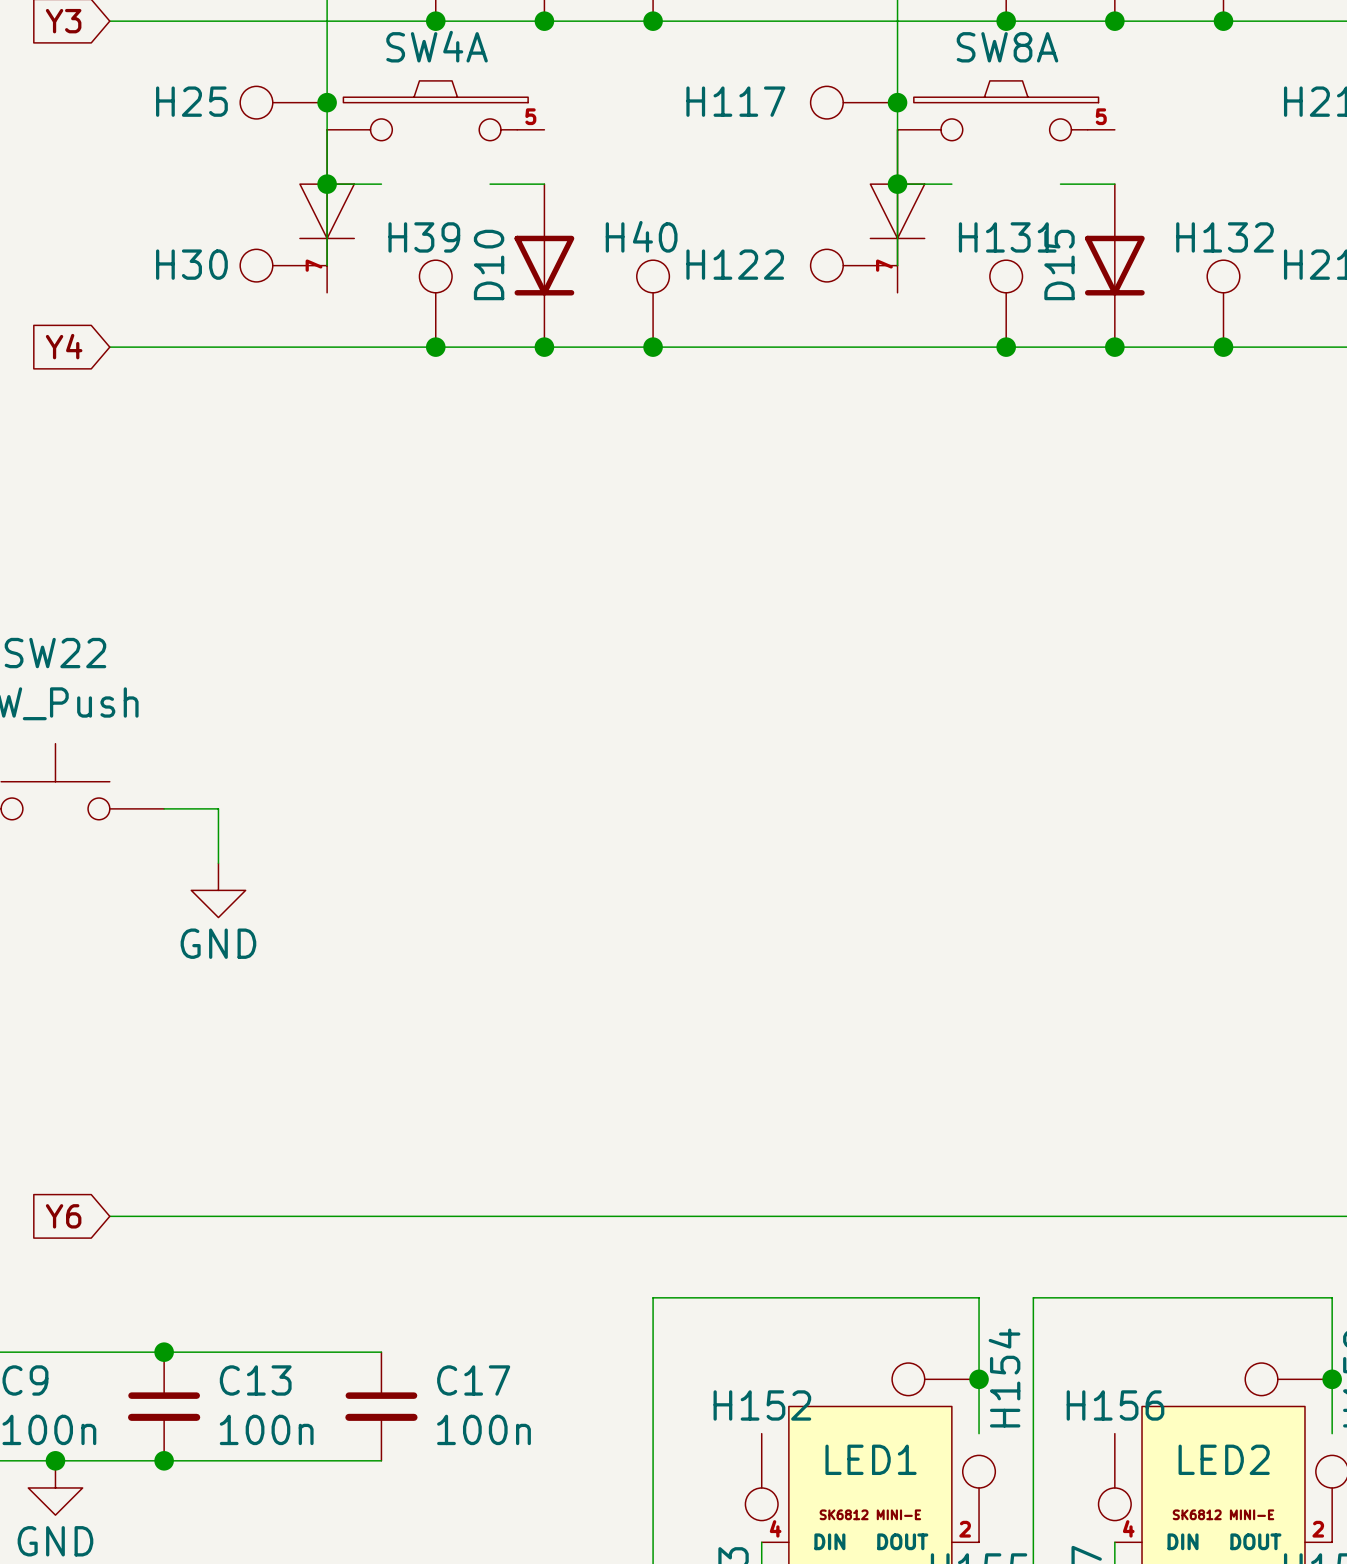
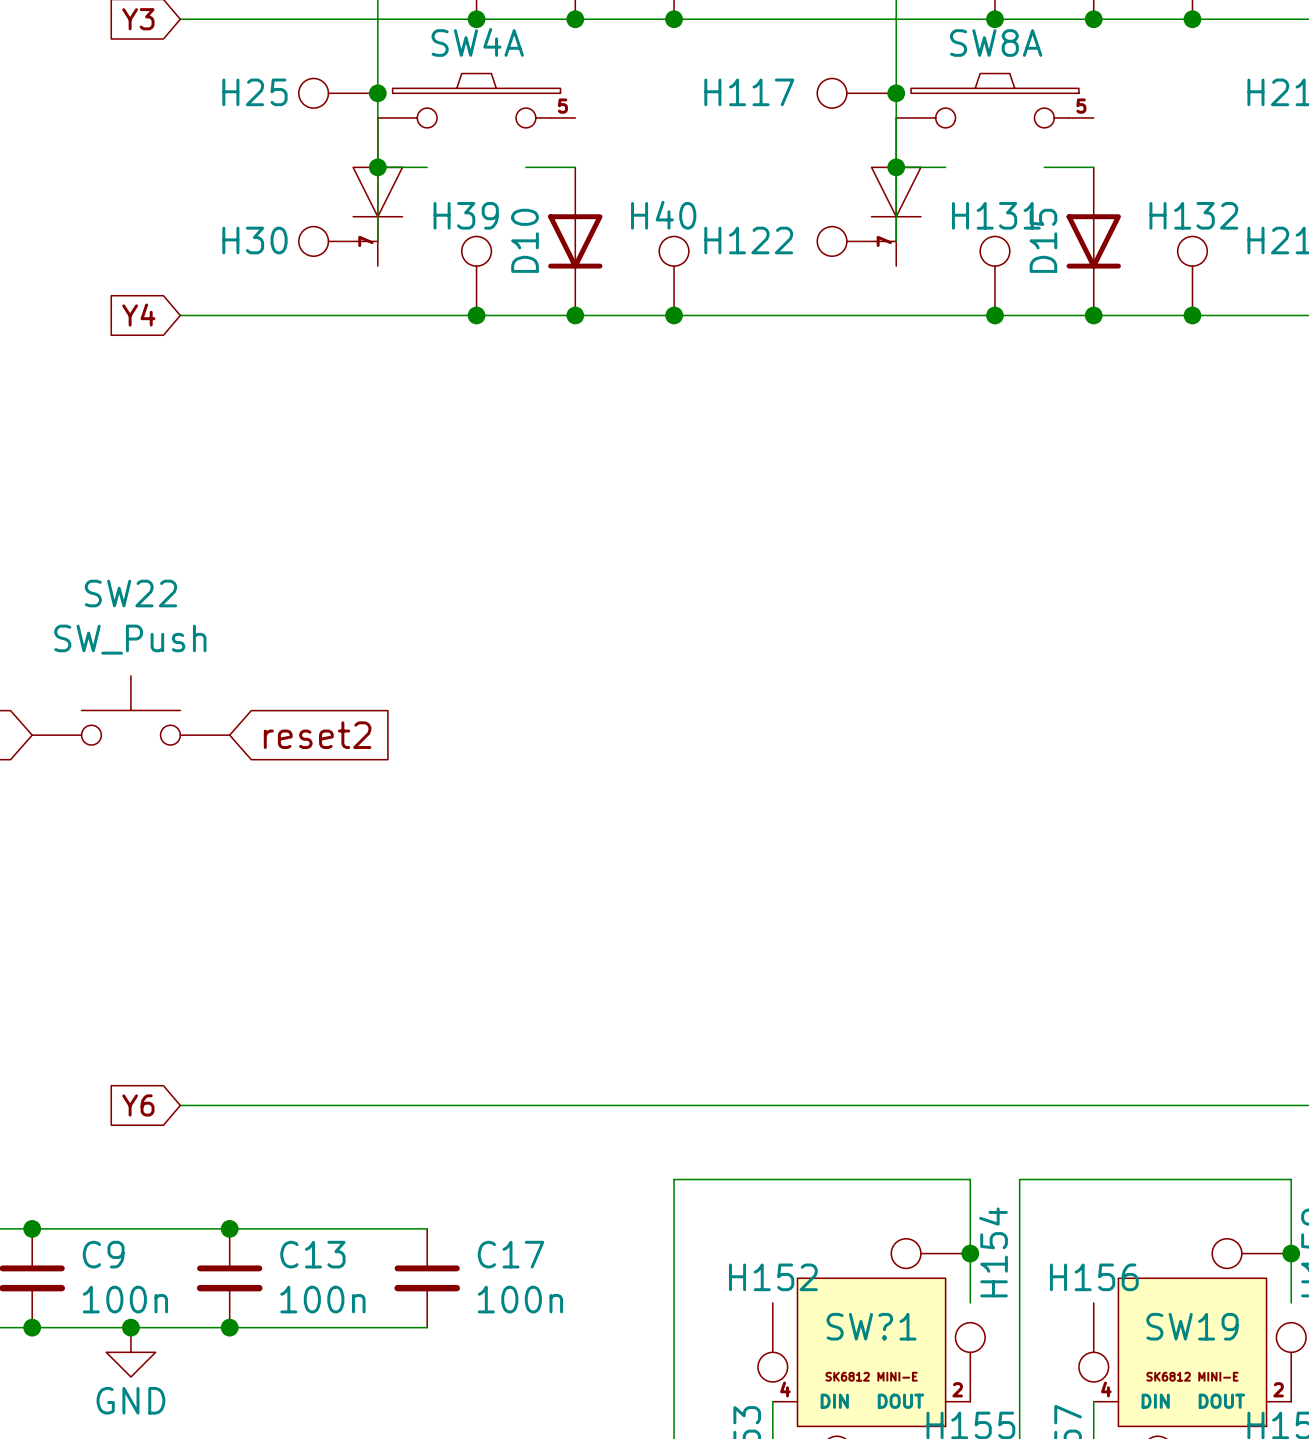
wire: (164, 808) (218, 808) (218, 863) -> none
global label: none -> reset2 (317, 735)
power symbol: GND (218, 890) -> none
LED1 name: LED1 (871, 1459) -> SW?1 (871, 1326)
LED2 name: LED2 (1224, 1459) -> SW19 (1192, 1326)

